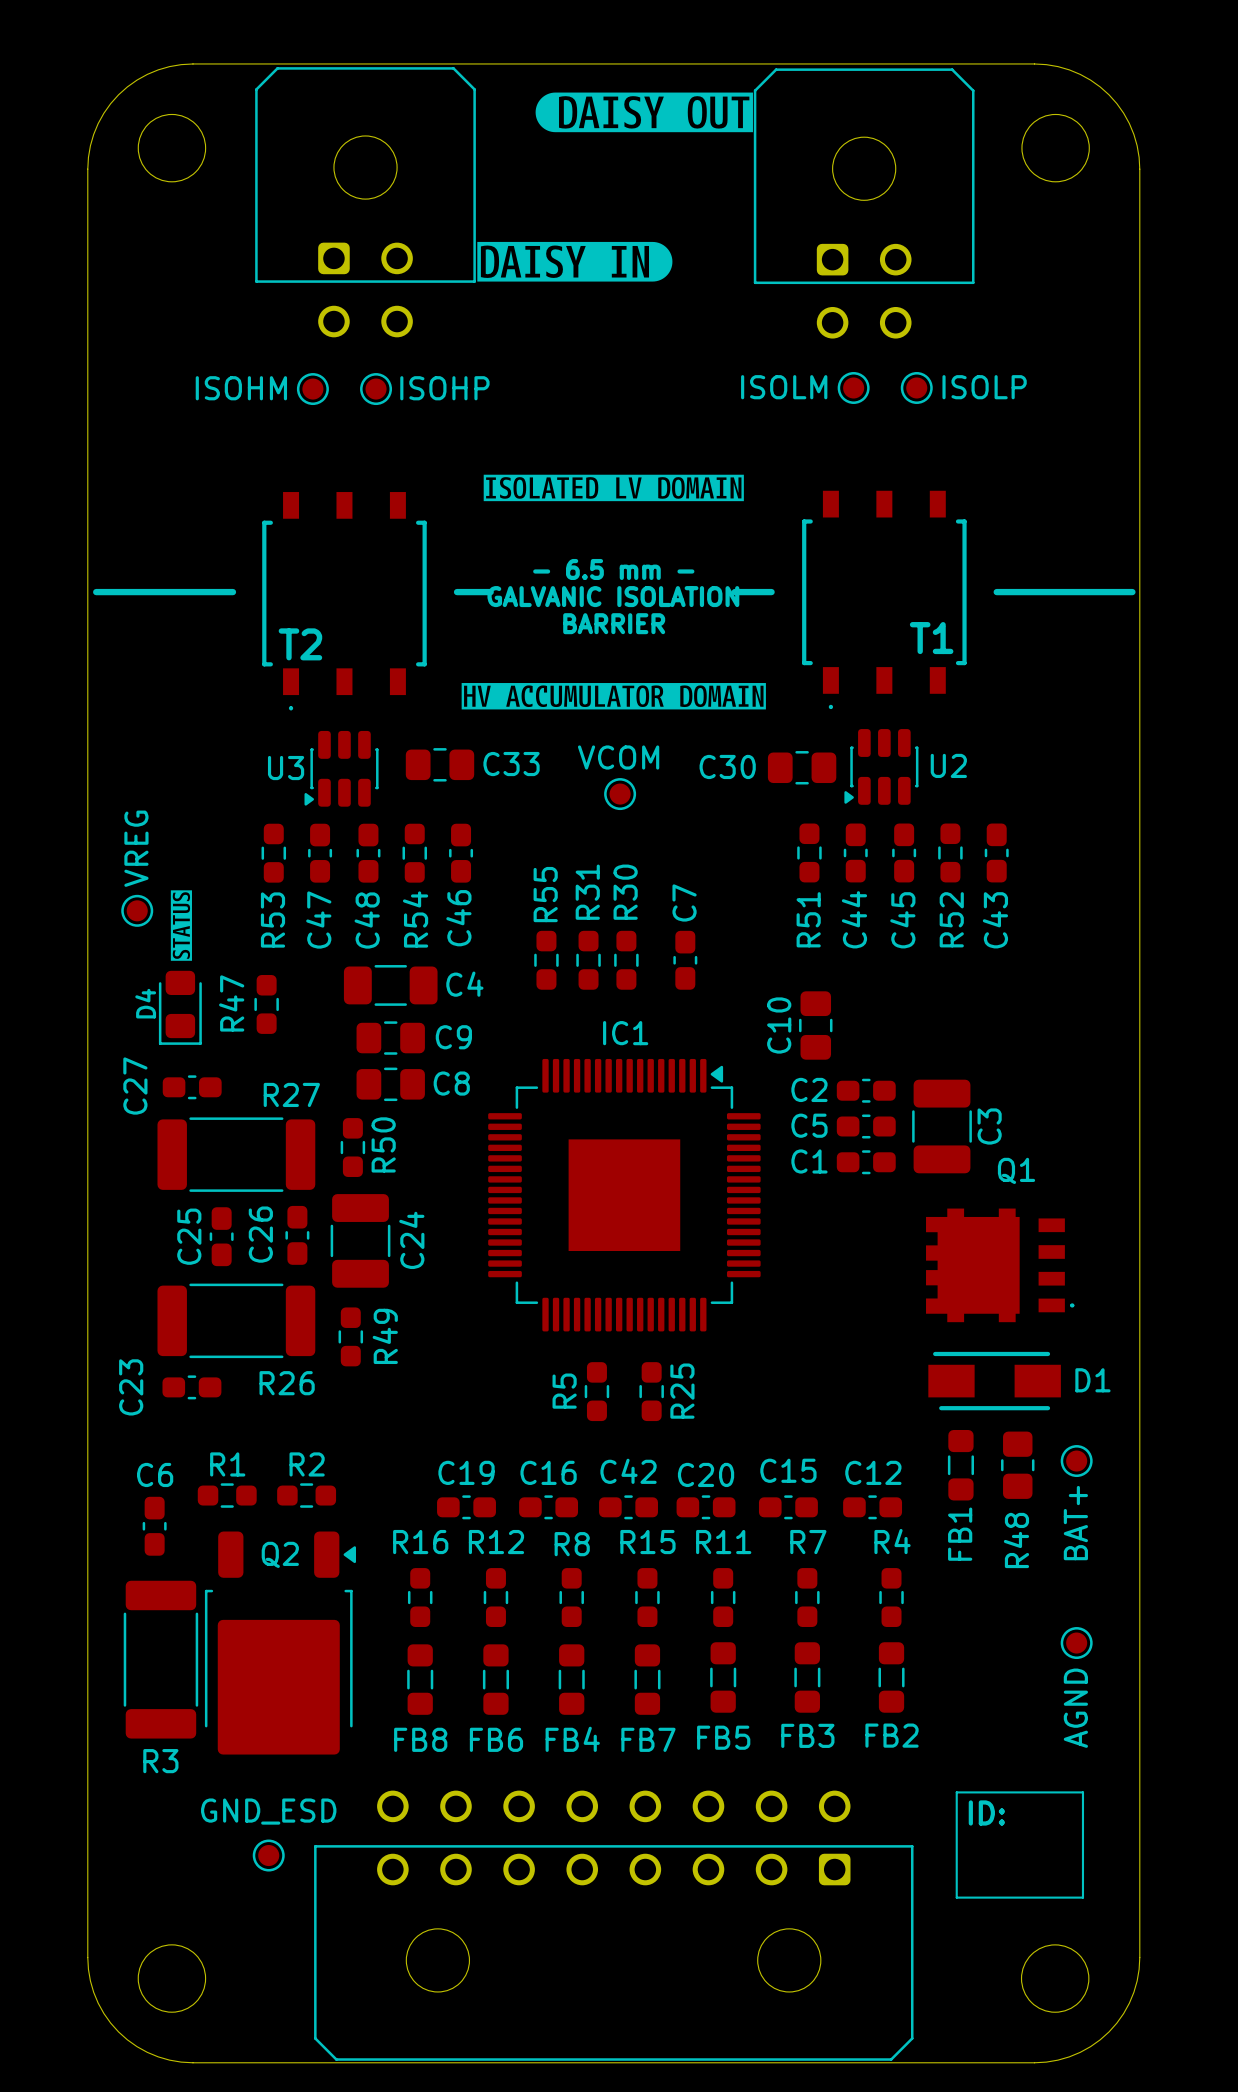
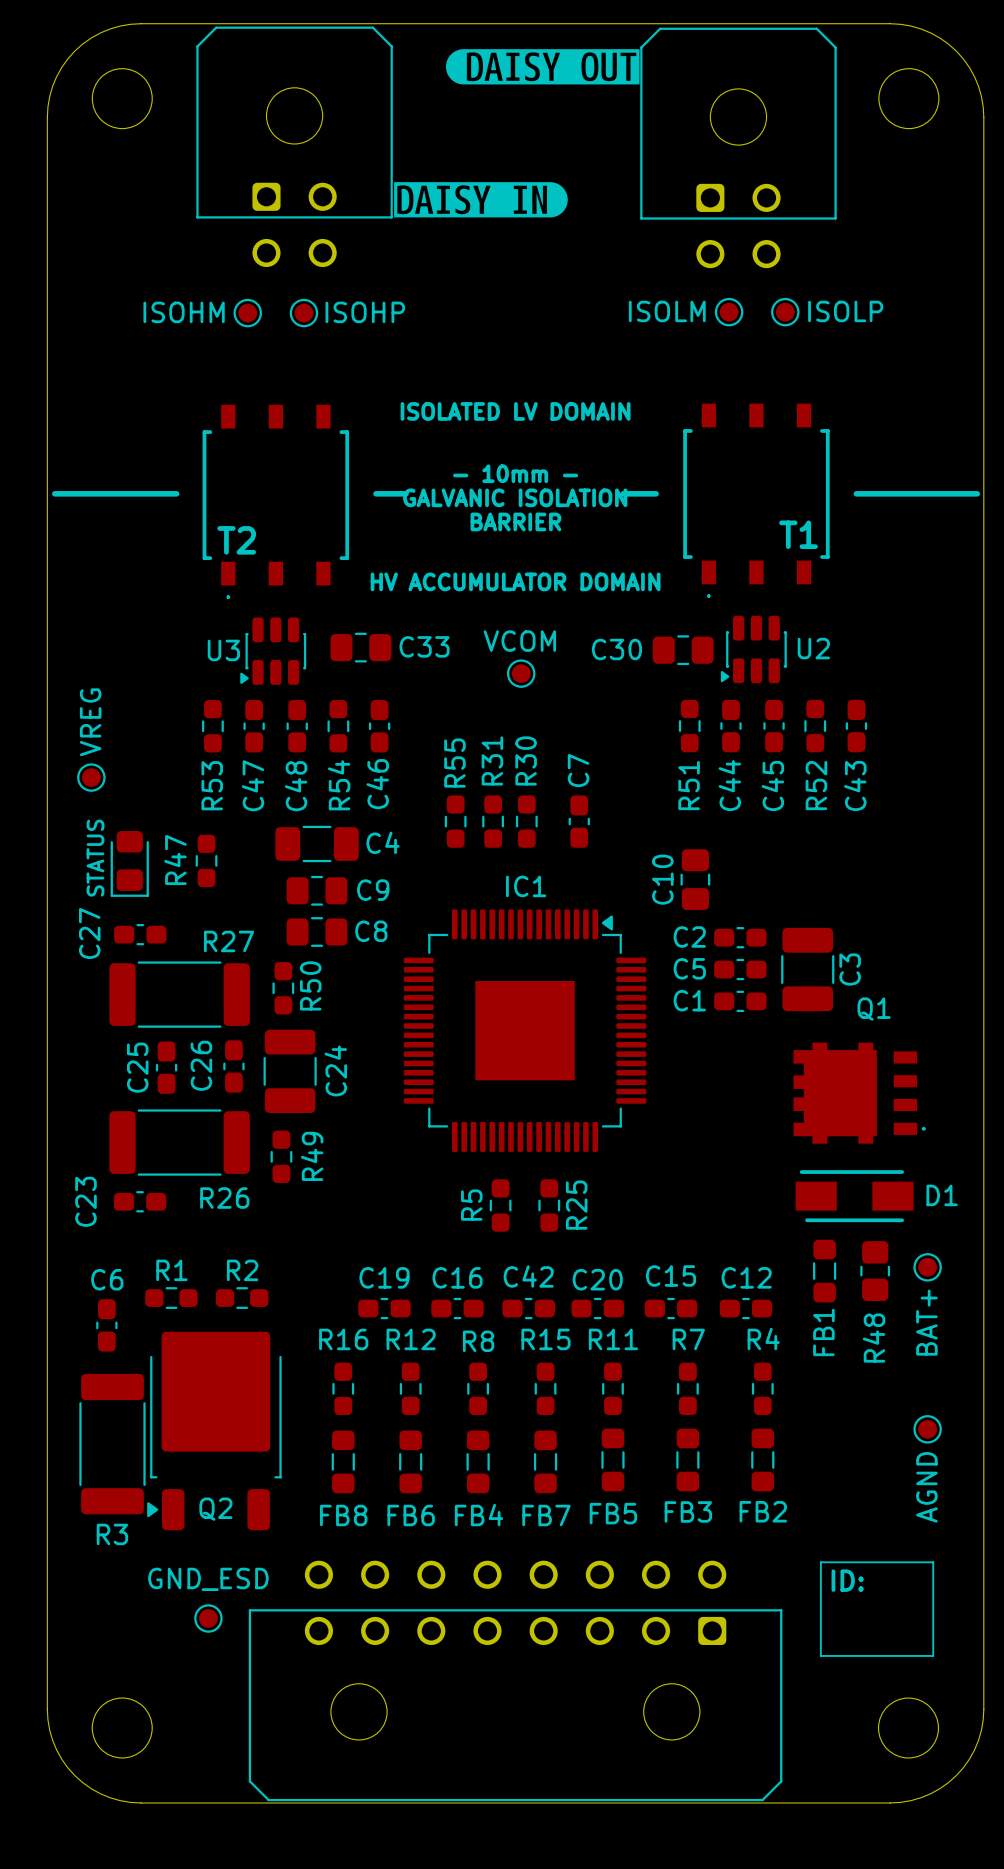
drawing: [483, 474, 744, 502] -> none
text: none -> ISOLATED LV DOMAIN (515, 411)
text: - 6.5 mm - (613, 569) -> - 10mm - (515, 473)
drawing: [461, 683, 766, 710] -> none
text: none -> HV ACCUMULATOR DOMAIN (515, 581)
drawing: [170, 890, 192, 961] -> none
D4 name: D4 (145, 1003) -> STATUS (95, 858)
Q2 rotation: 0° (280, 1643) -> 180° (214, 1431)

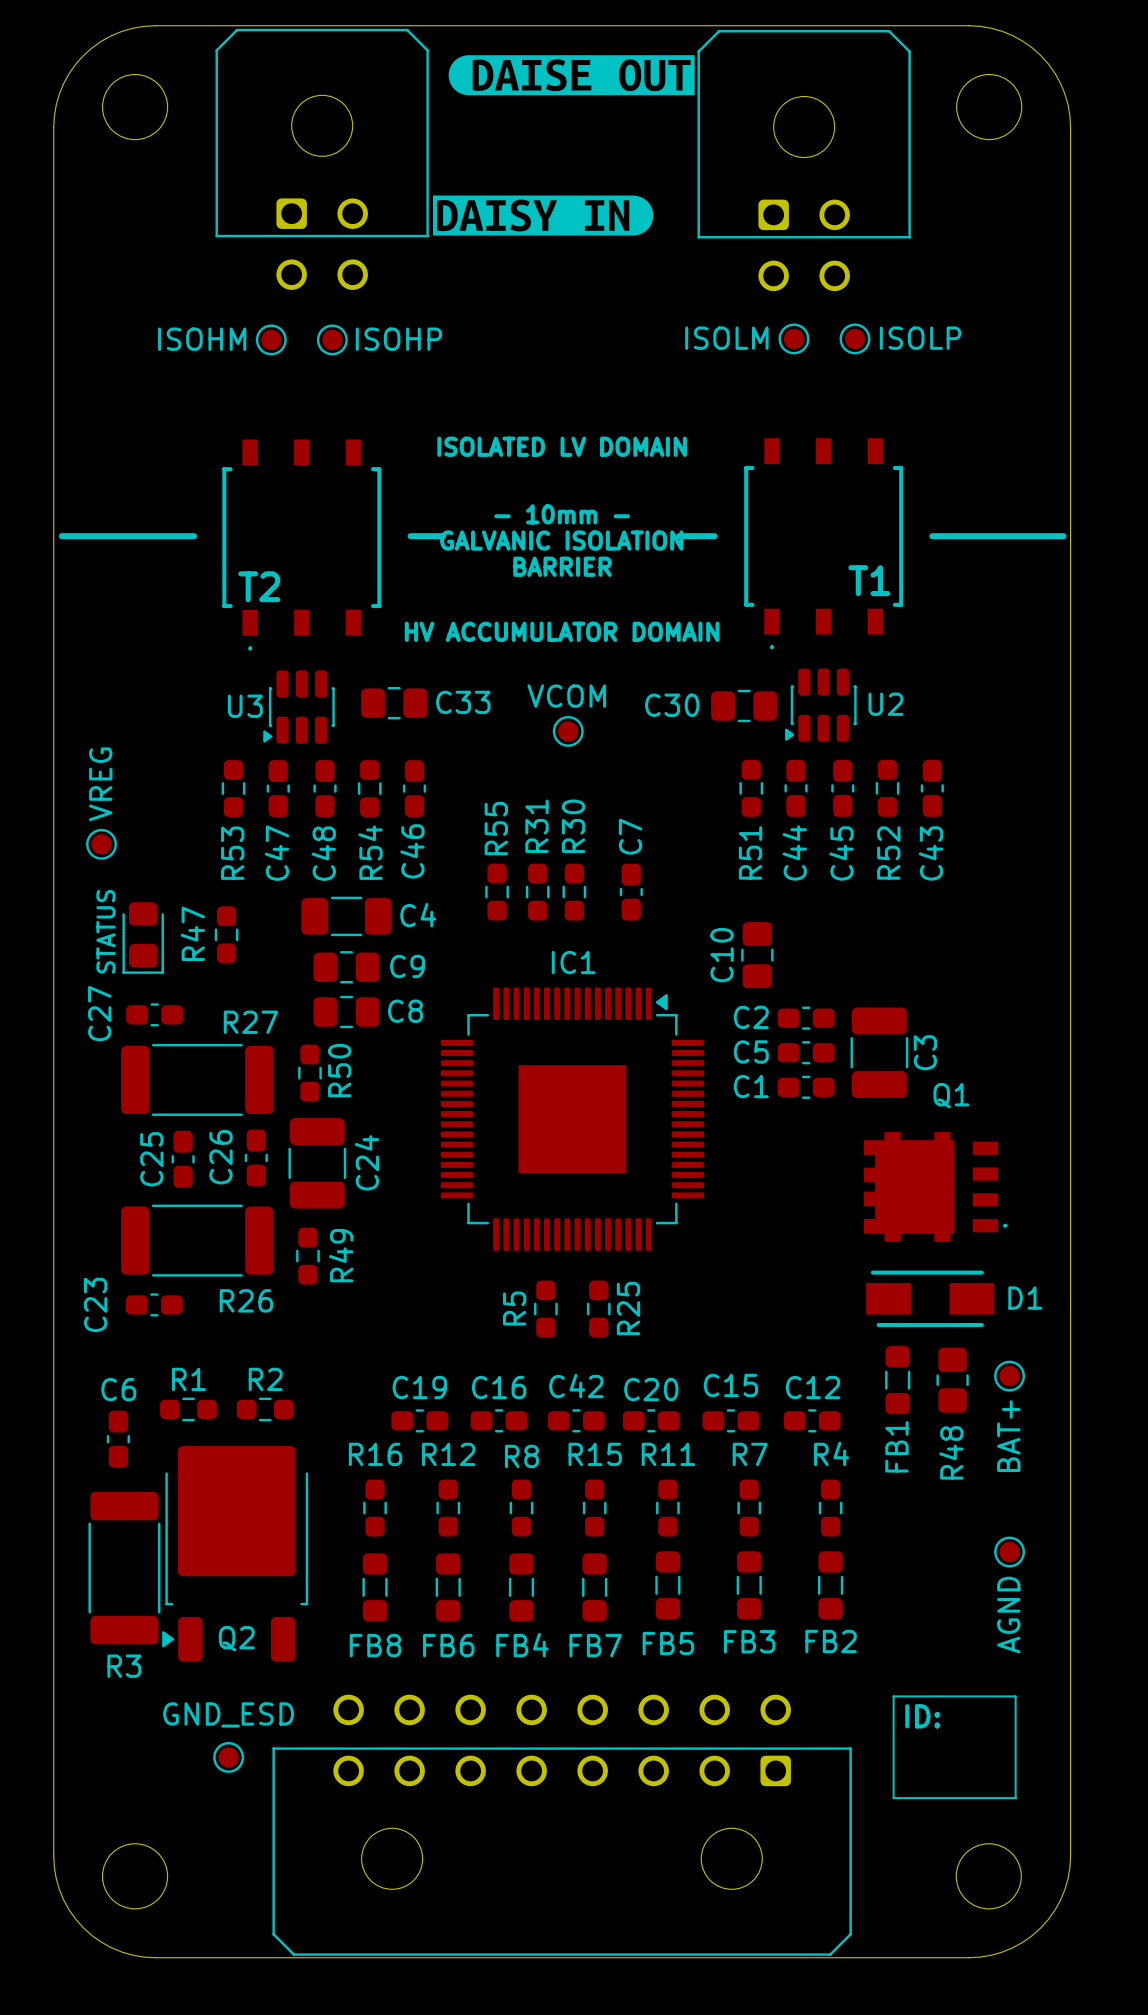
drawing shape: [445, 49, 640, 85] -> [448, 55, 695, 96]
drawing shape: [394, 182, 568, 218] -> [432, 195, 654, 236]

